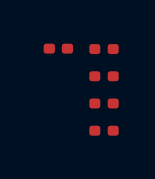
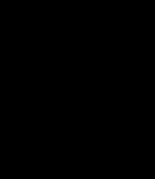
part: (58, 48) -> none
part: (104, 49) -> none
part: (104, 76) -> none
part: (104, 103) -> none
part: (104, 130) -> none

